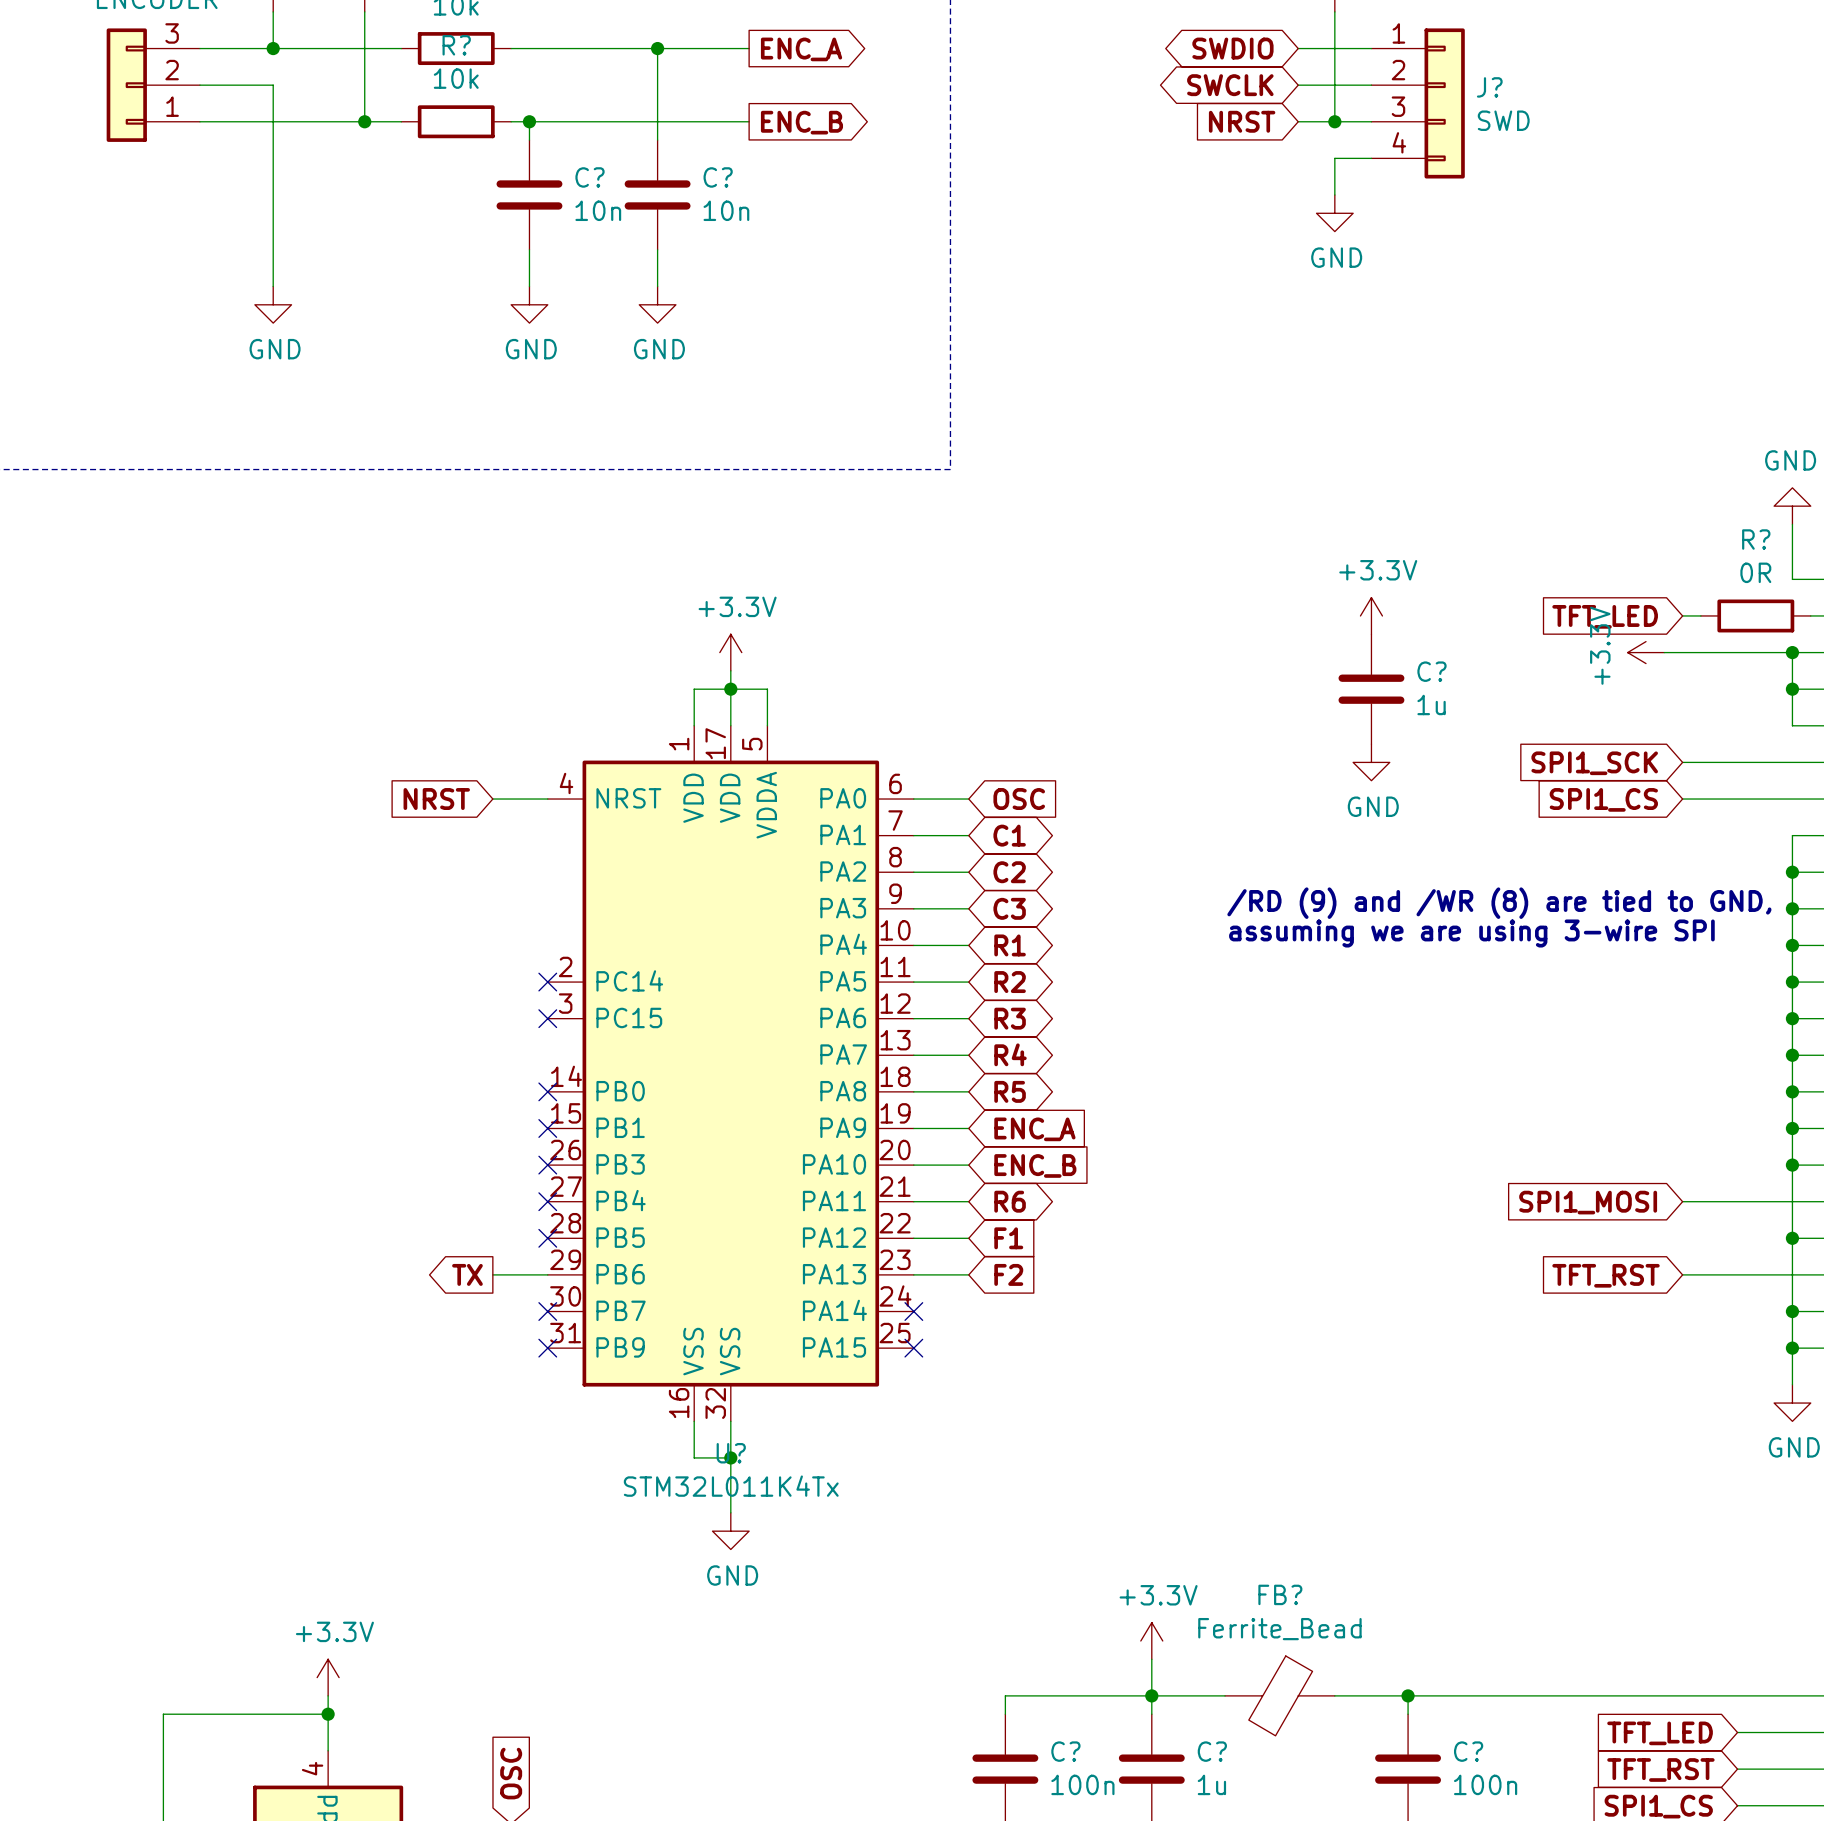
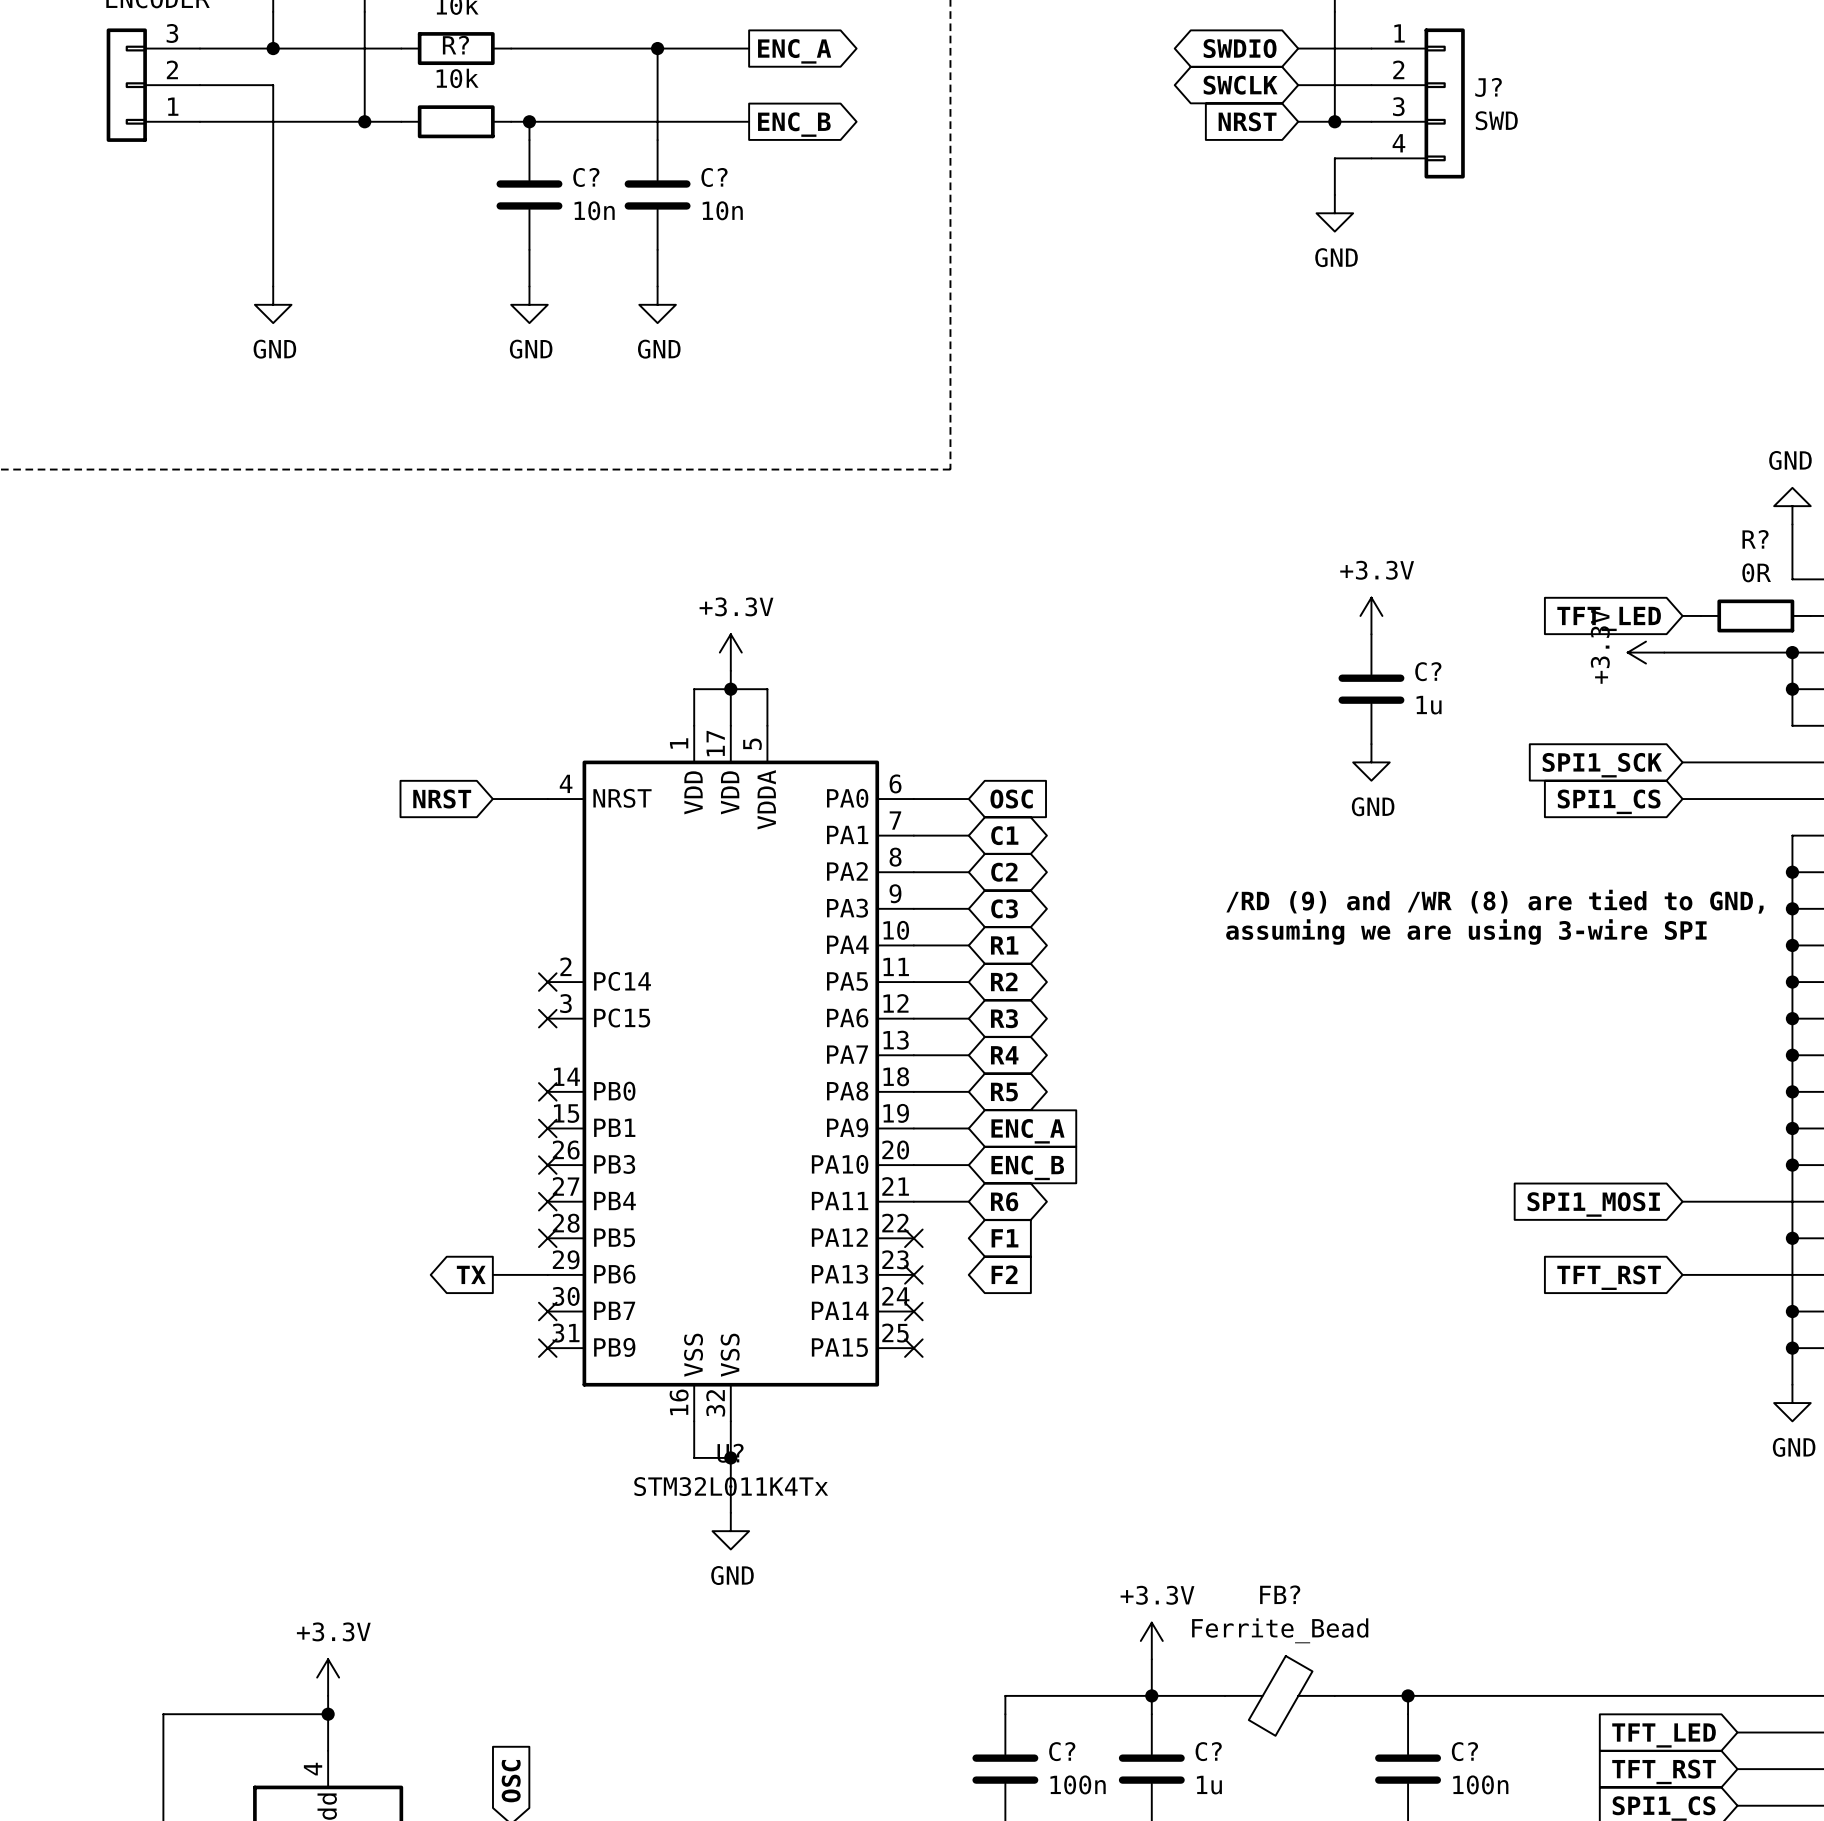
wire: (913, 1238) (968, 1238) -> none
no-connect mark: none -> (913, 1238)
wire: (913, 1274) (968, 1274) -> none
no-connect mark: none -> (913, 1274)

